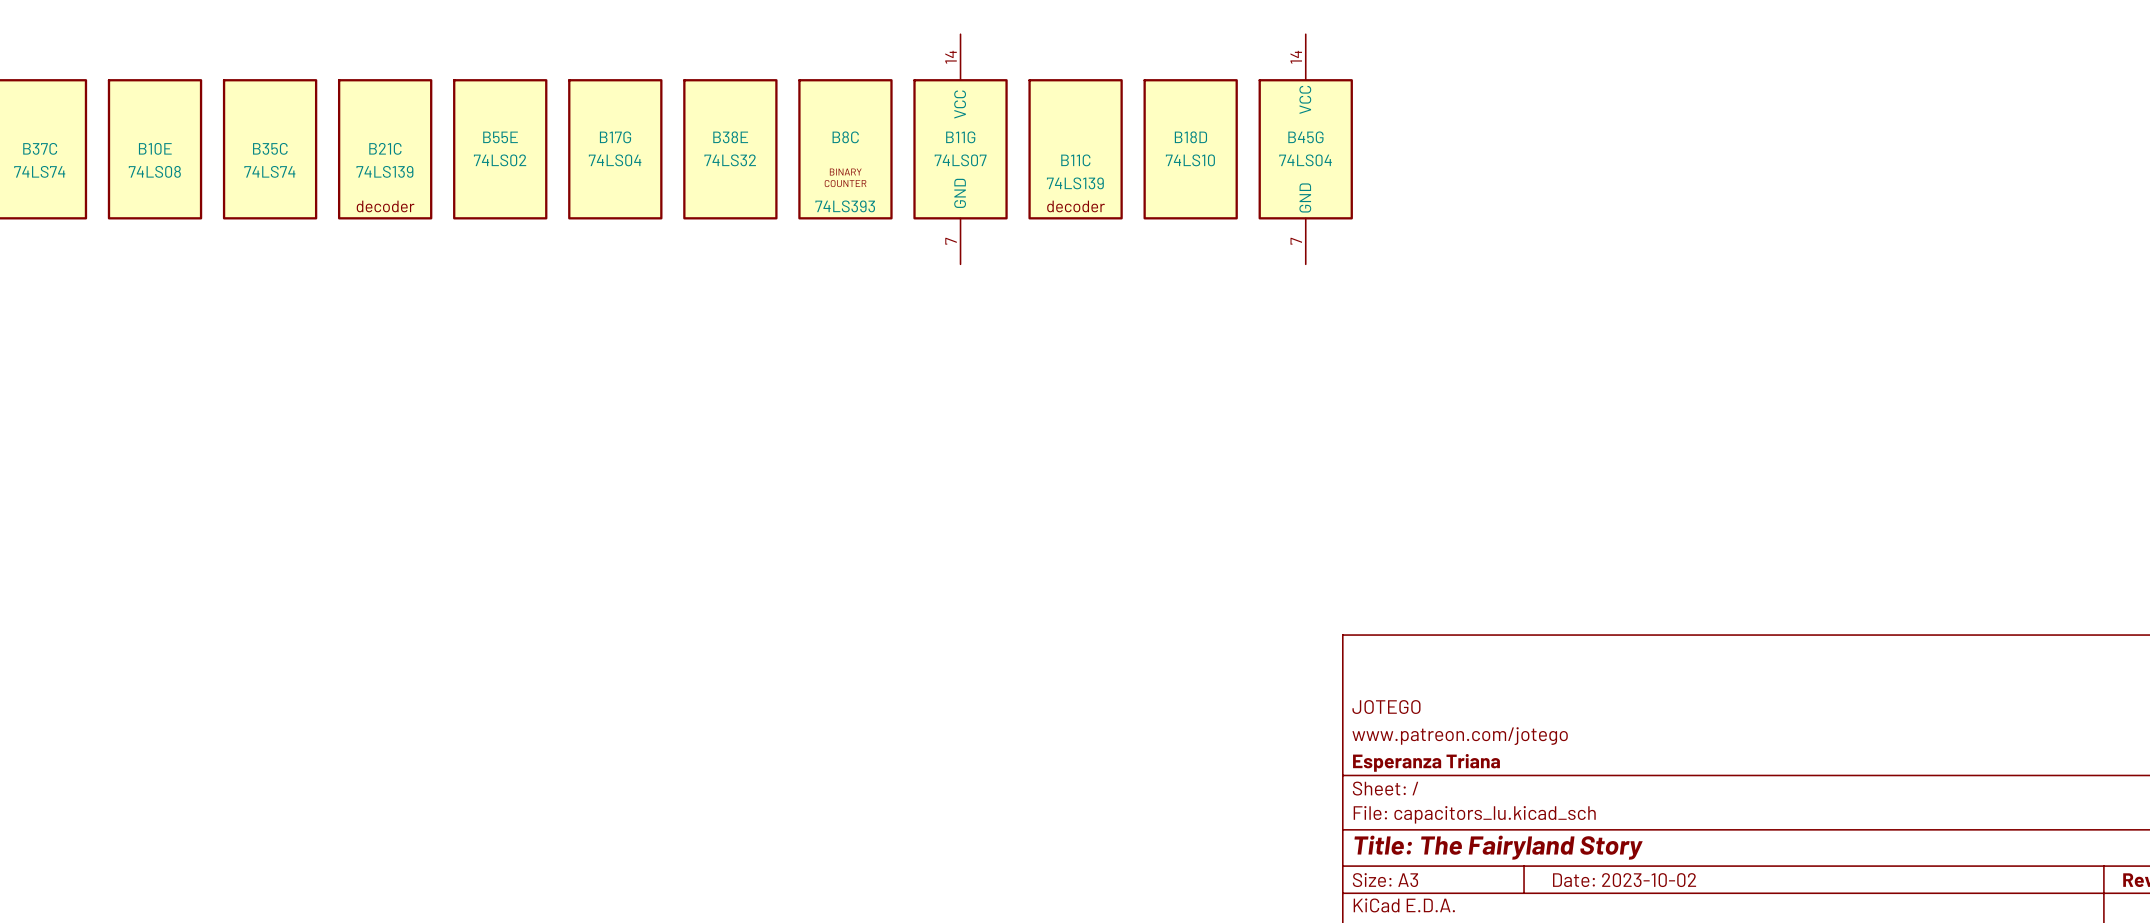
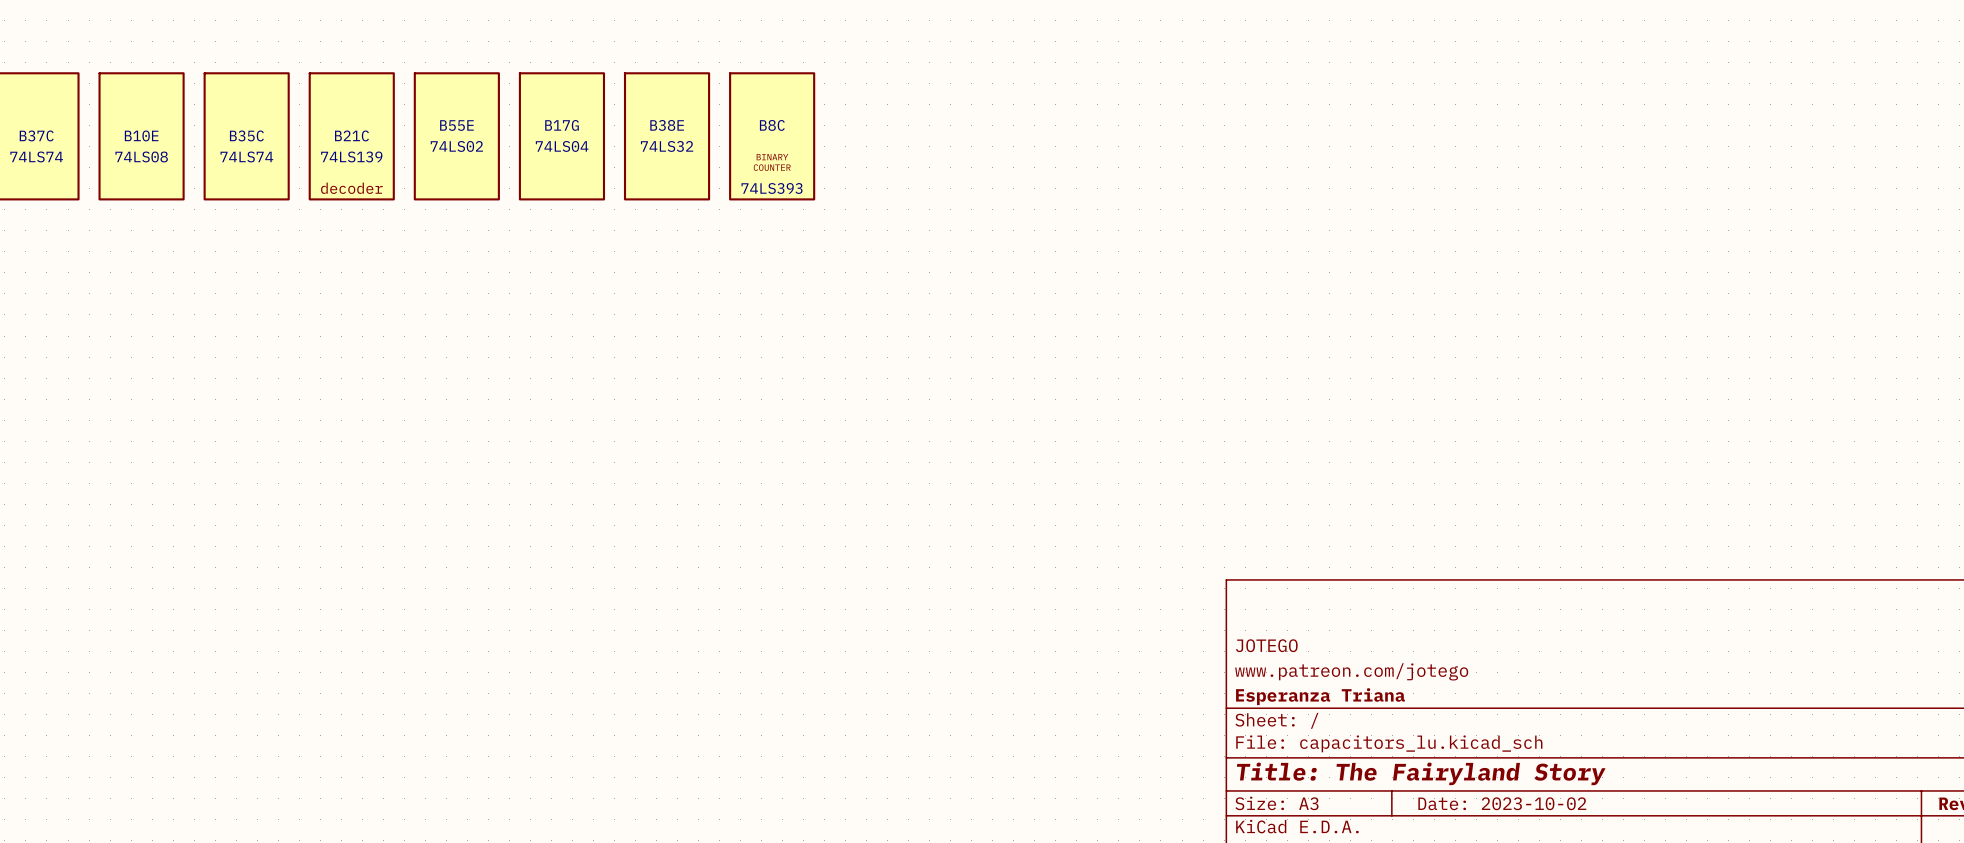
B11G: 74LS07 (960, 149) -> none
B11C: 74LS139 (1075, 149) -> none
B18D: 74LS10 (1190, 149) -> none
B45G: 74LS04 (1305, 149) -> none

